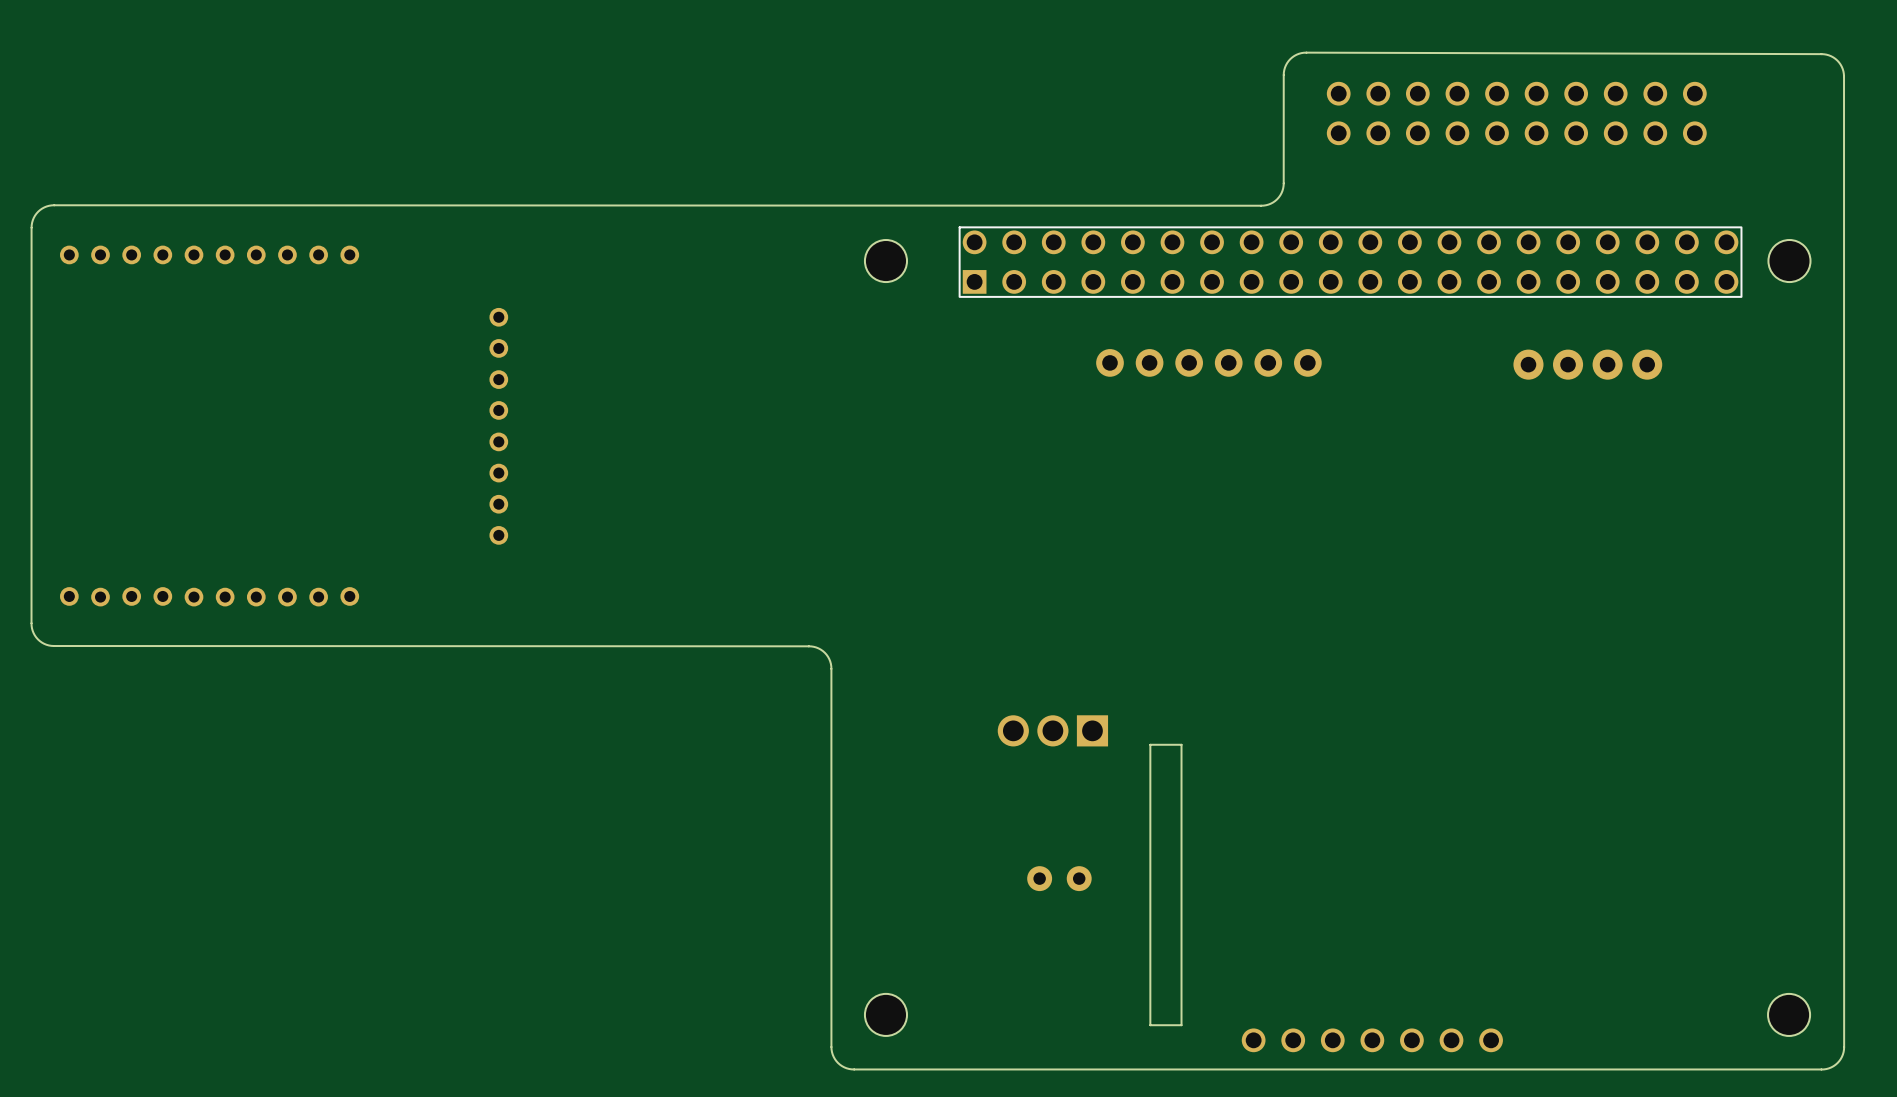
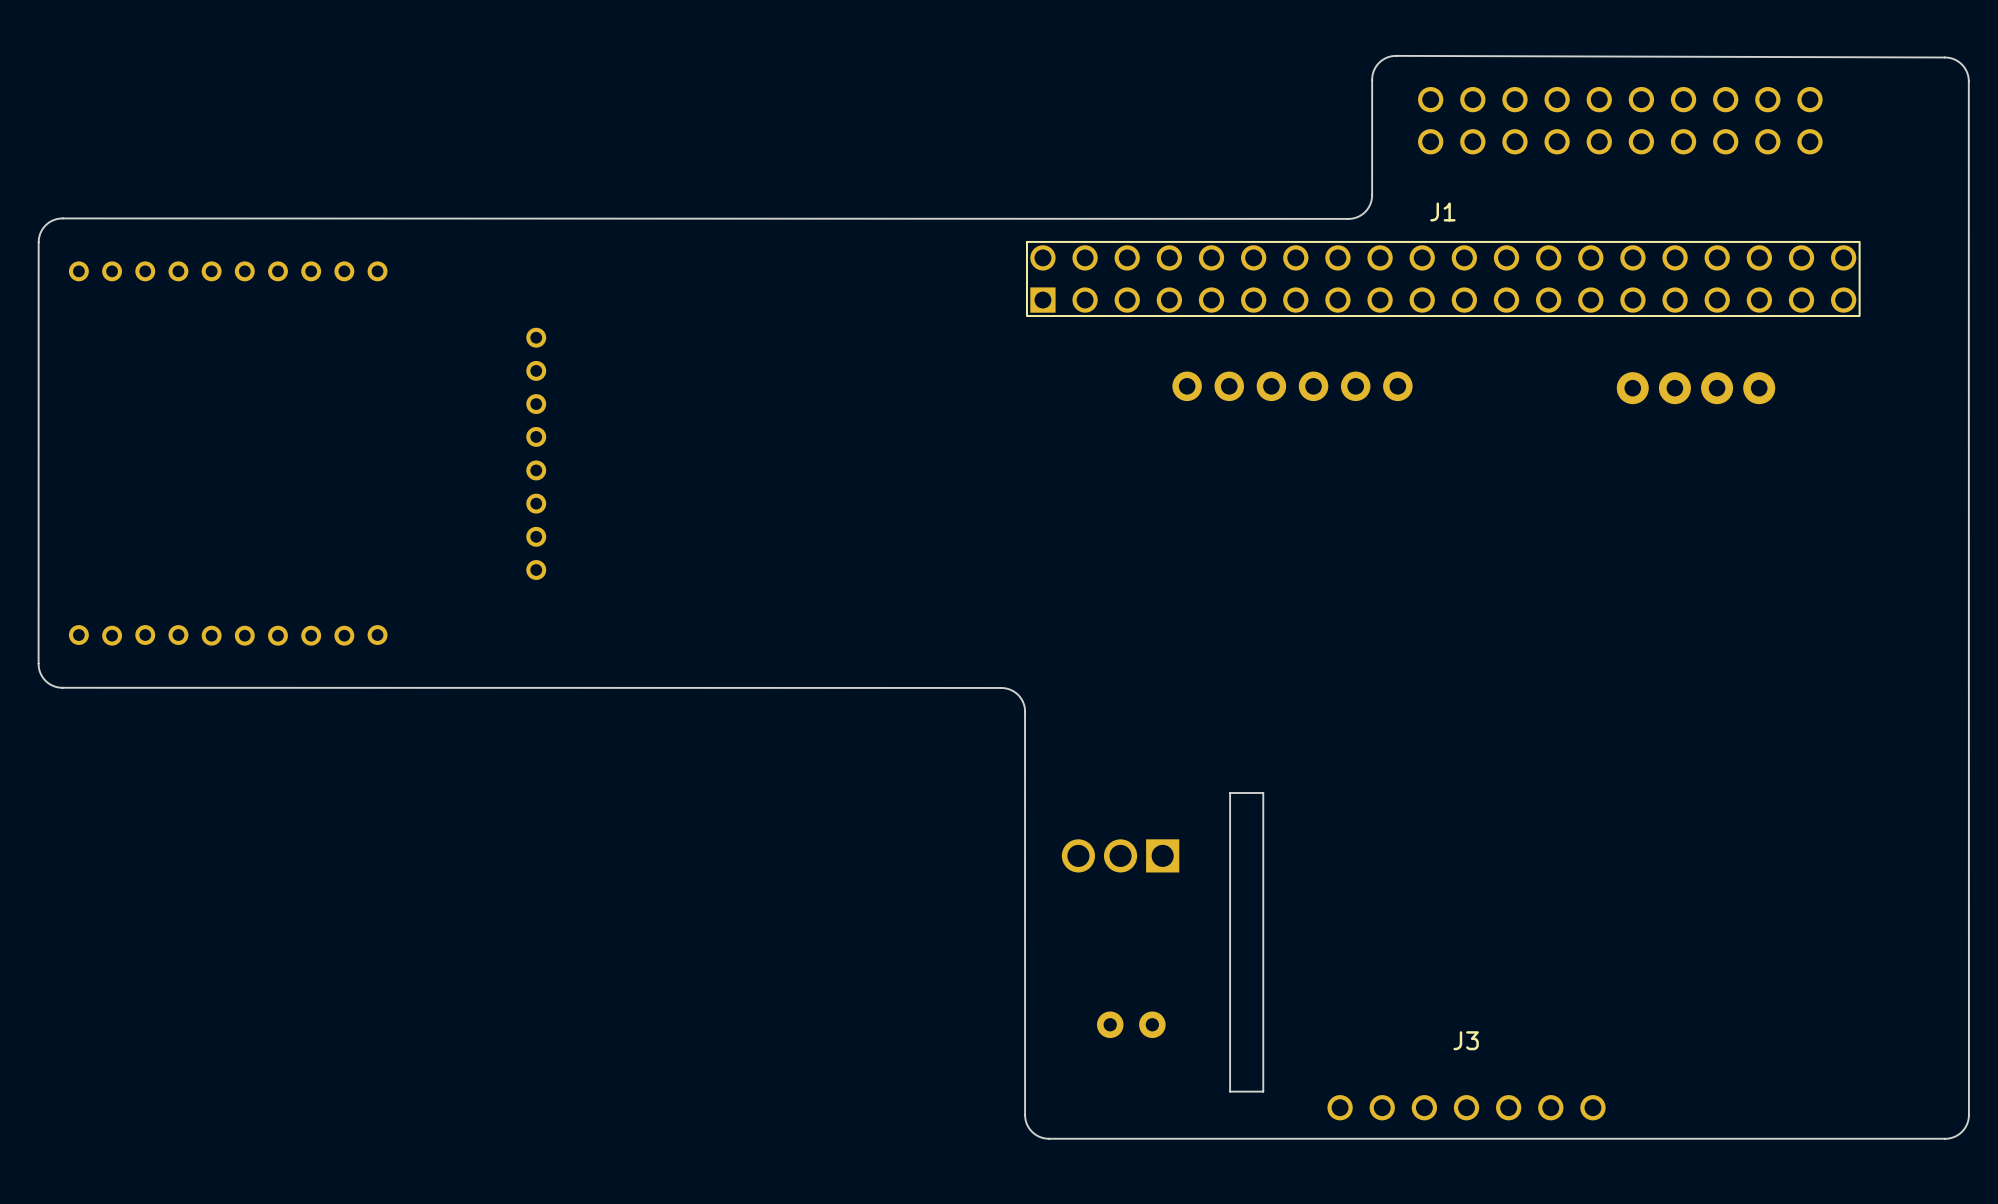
J1 name: none -> J1 (1442, 211)
part: (885, 261) -> none
part: (1789, 261) -> none
board edge: (53, 646) (808, 646) -> (62, 687) (1000, 687) (1008, 689) (1018, 694) (1023, 703) (1025, 711)
board edge: (808, 646) (816, 647) (824, 652) (830, 661) (831, 668) -> none
board edge: (831, 668) (832, 1054) (840, 1064) (851, 1069) (980, 1069) -> (1025, 711) (1025, 1117) (1027, 1125) (1034, 1133) (1049, 1138)
part position: (1052, 730) -> (1120, 855)
part position: (1059, 878) -> (1131, 1024)
J3 name: none -> J3 (1466, 1040)
part: (885, 1014) -> none
part: (1789, 1014) -> none

